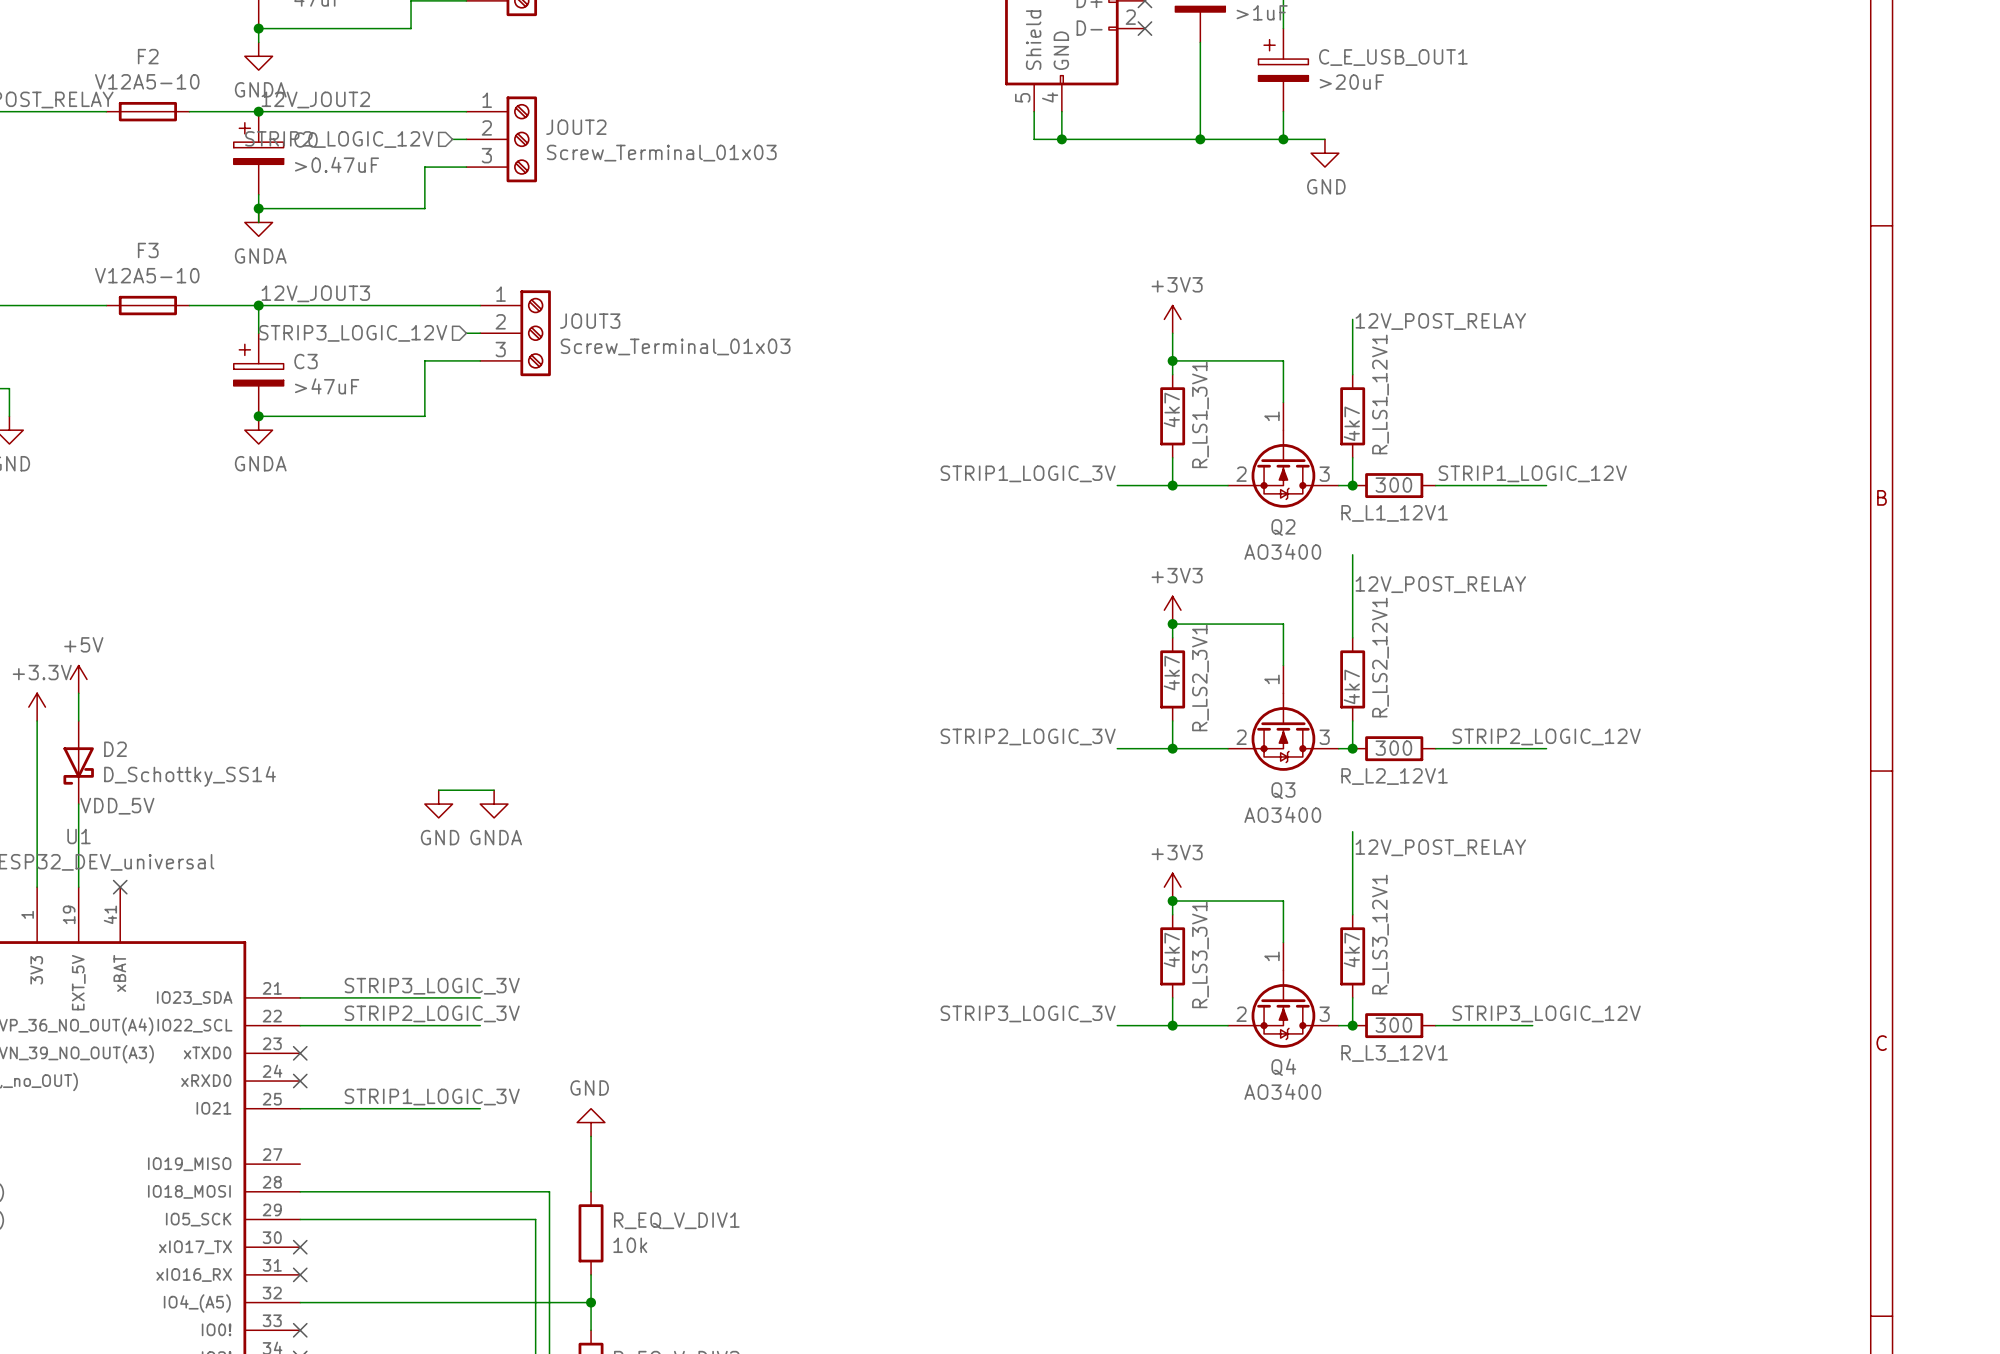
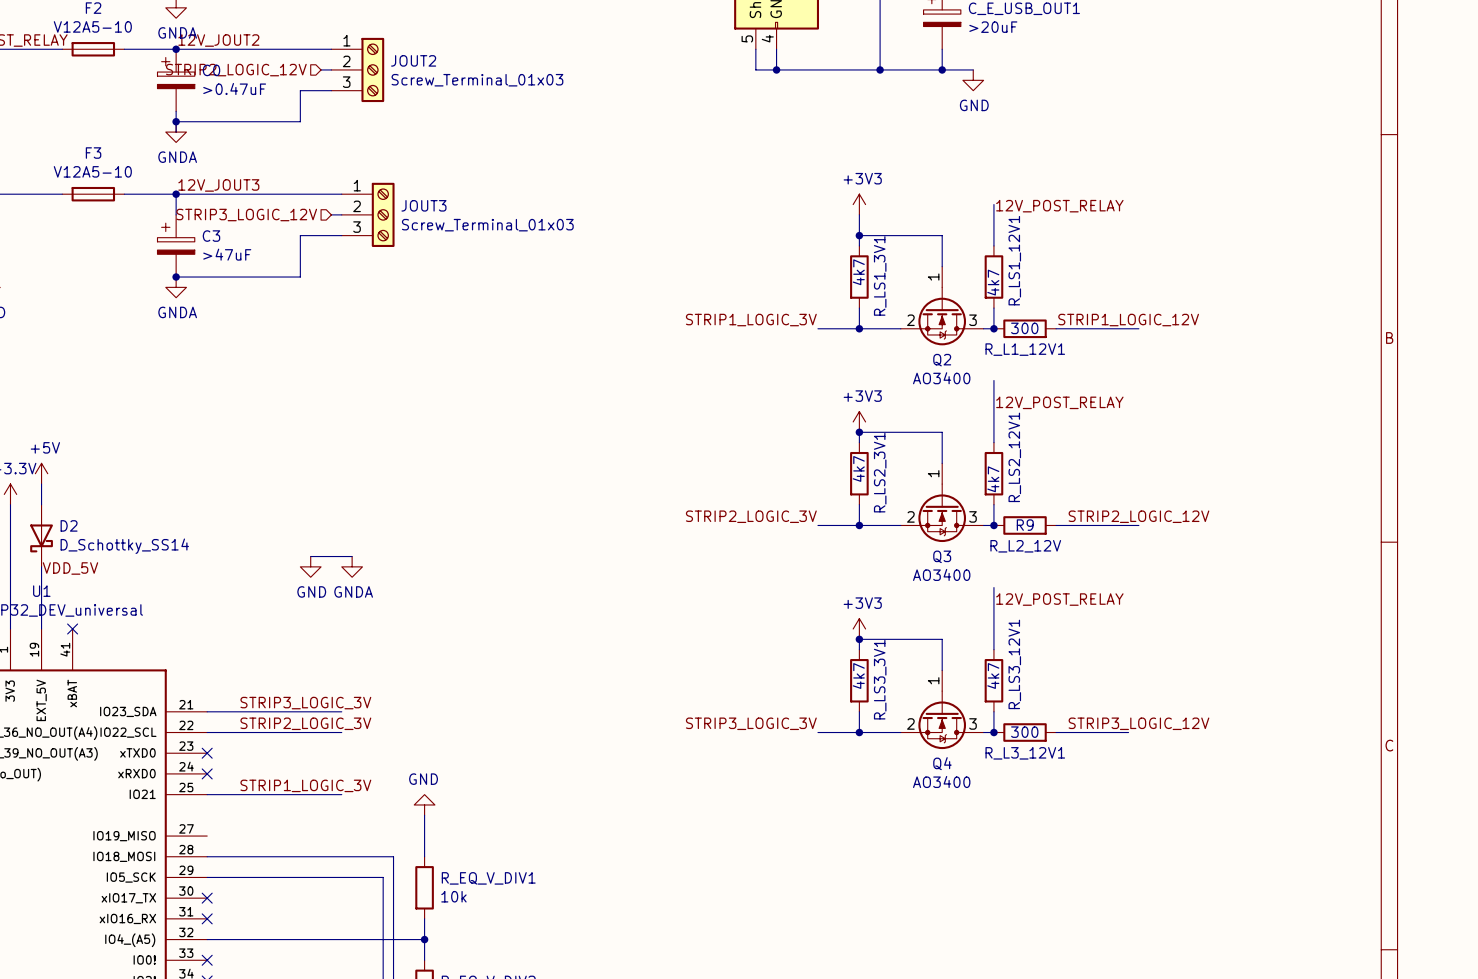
R_L2_12V1 value: 300 (1393, 748) -> R_L2_12V (1025, 546)
R_L2_12V1 name: R_L2_12V1 (1394, 776) -> R9 (1025, 525)

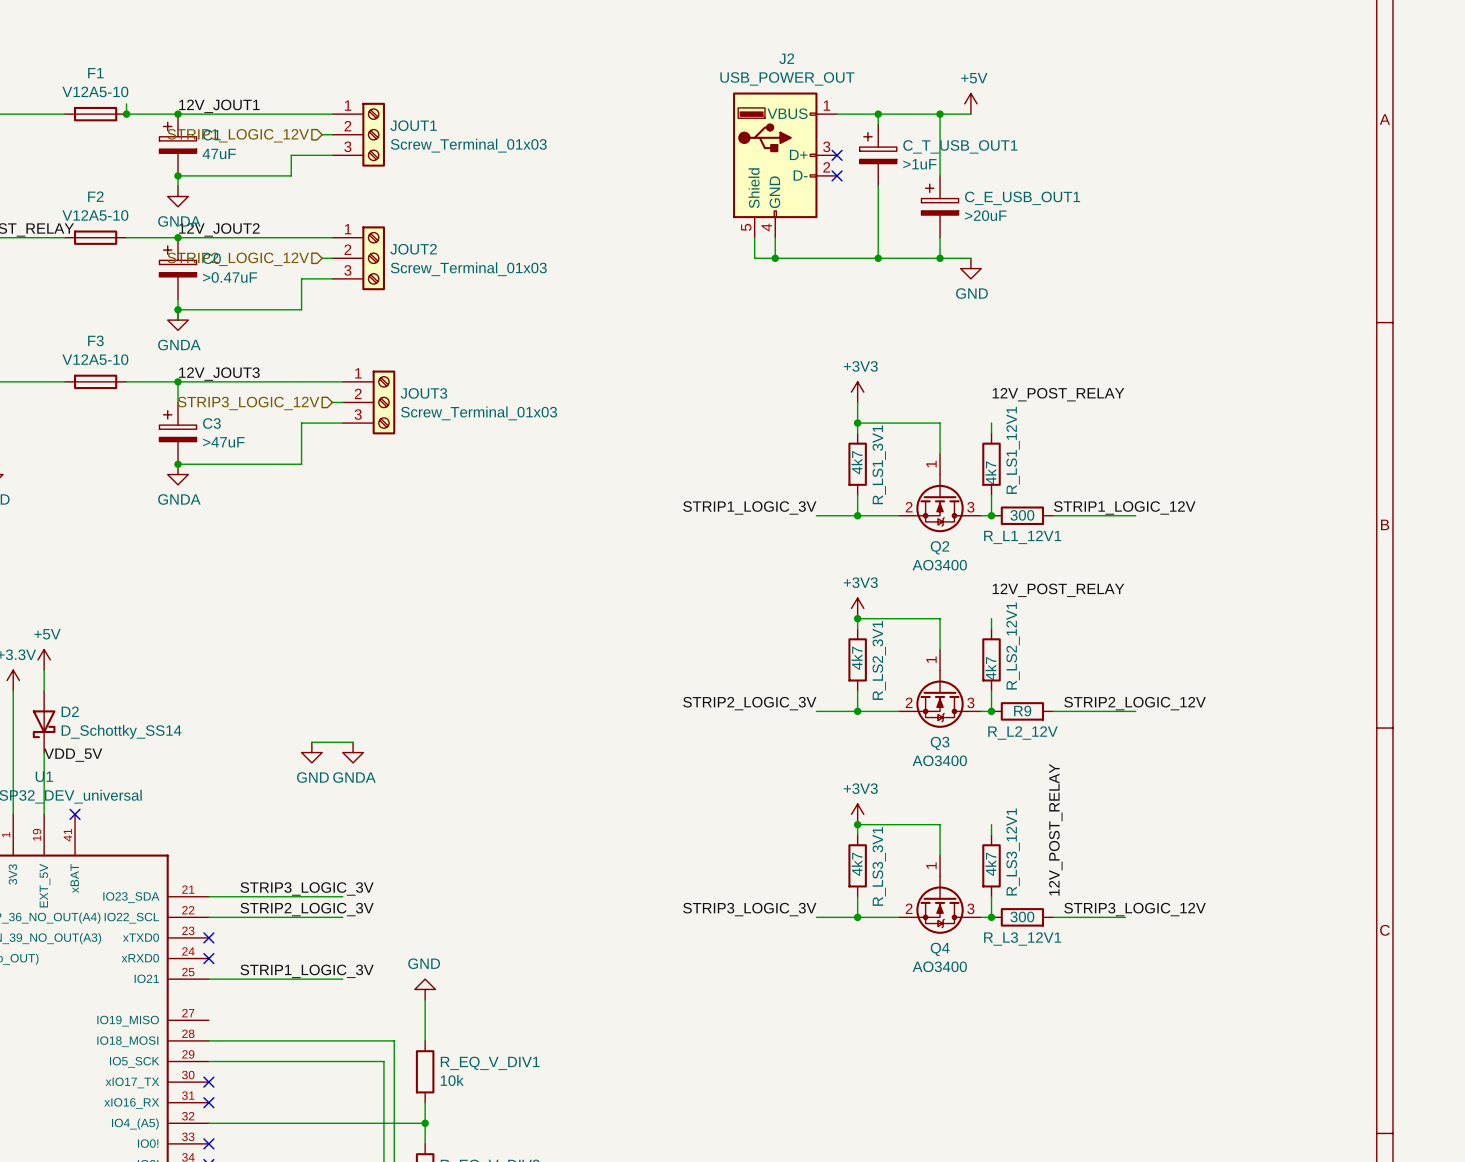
wire: (993, 204) (993, 235) -> none
wire: (993, 380) (993, 432) -> none
wire: (993, 587) (993, 639) -> none
label rotation: 0° (1059, 599) -> 90° counterclockwise (1055, 829)

